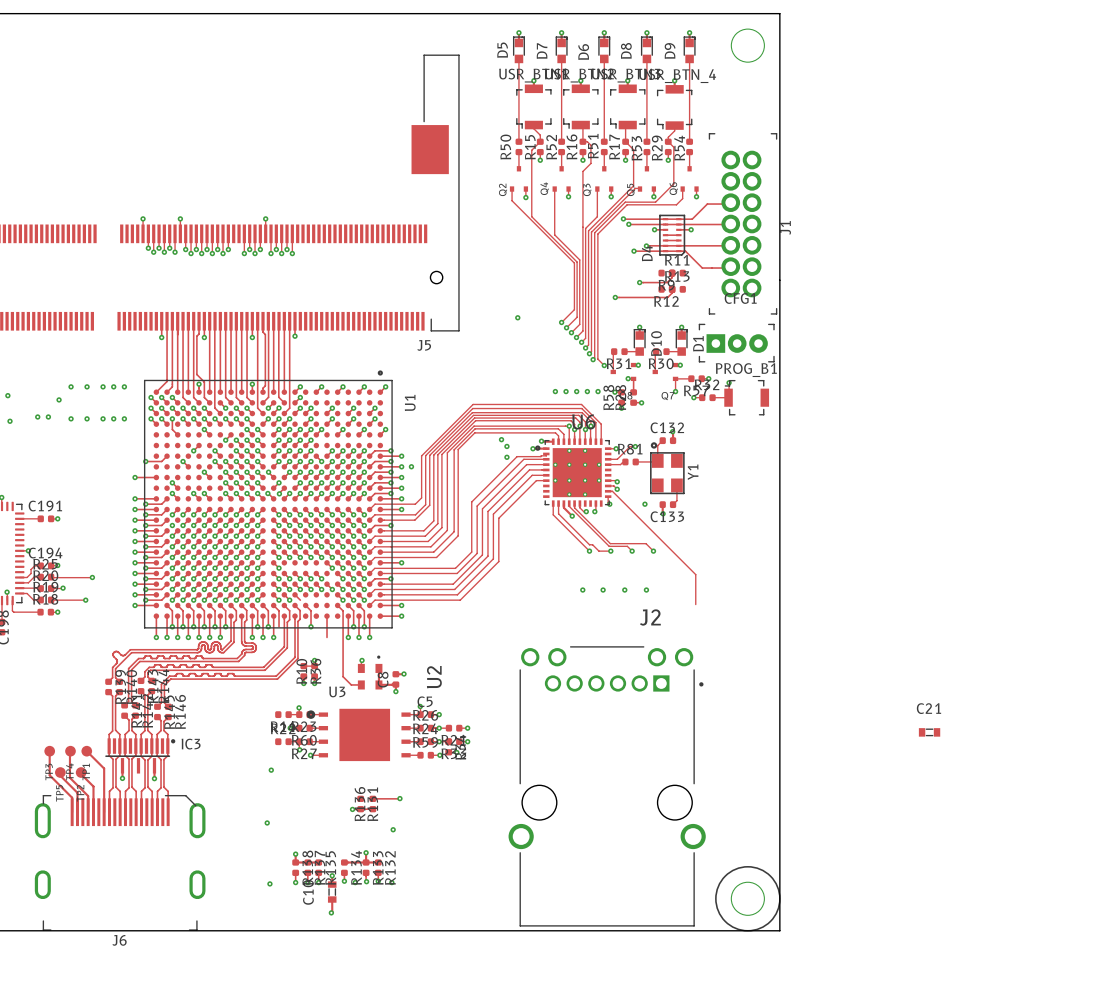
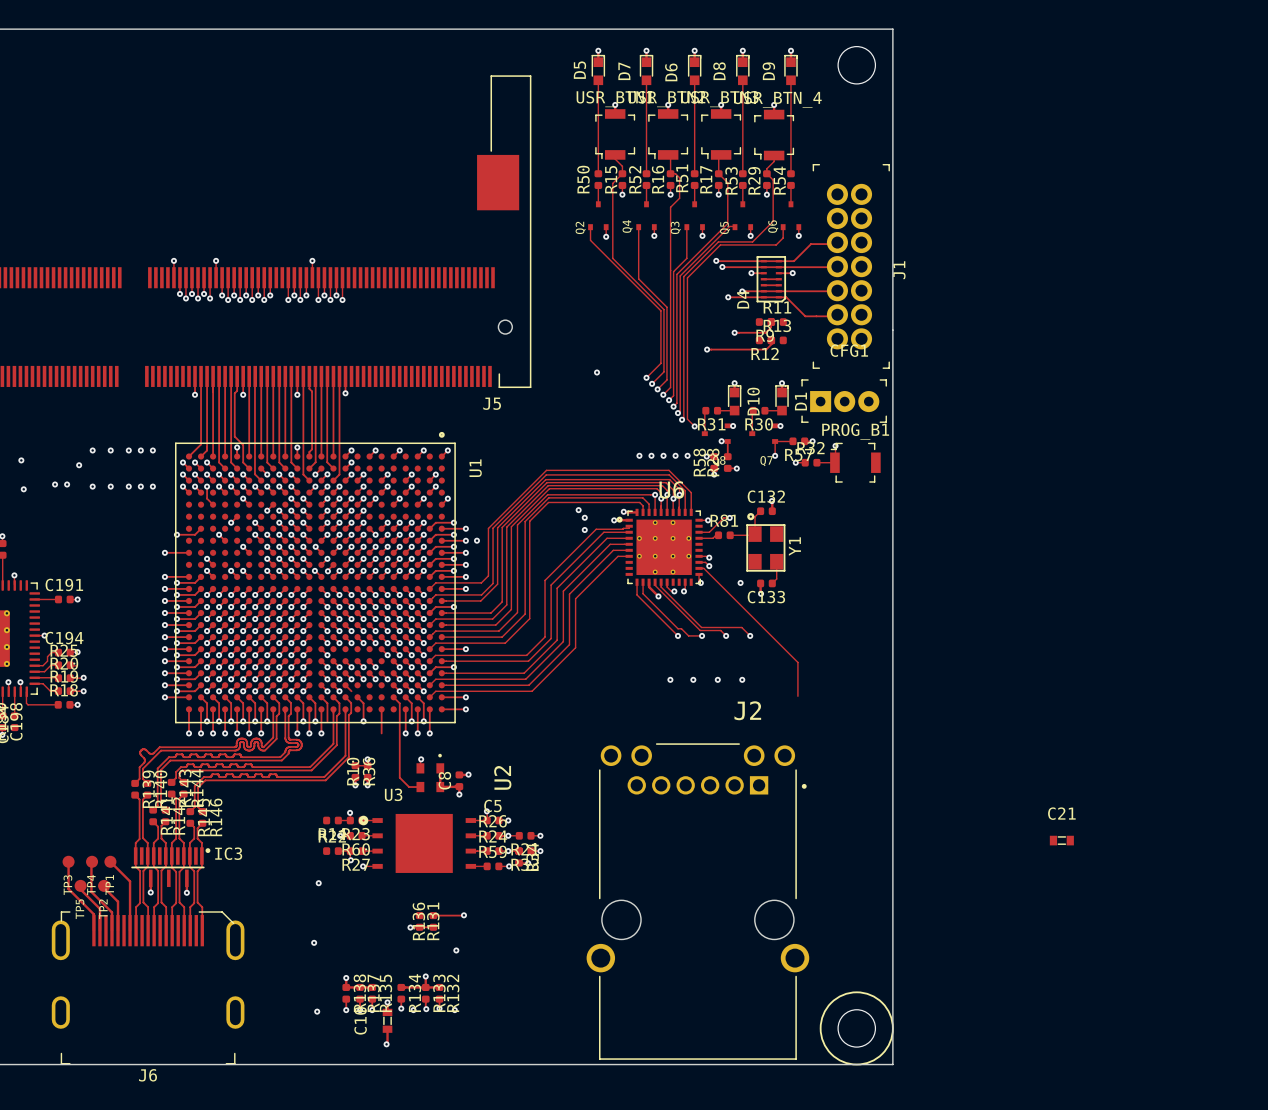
track: (92, 577) (57, 577) -> none
via: (92, 577) -> none
track: (63, 600) (85, 600) -> none
via: none -> (83, 691)
via: (85, 600) -> none

